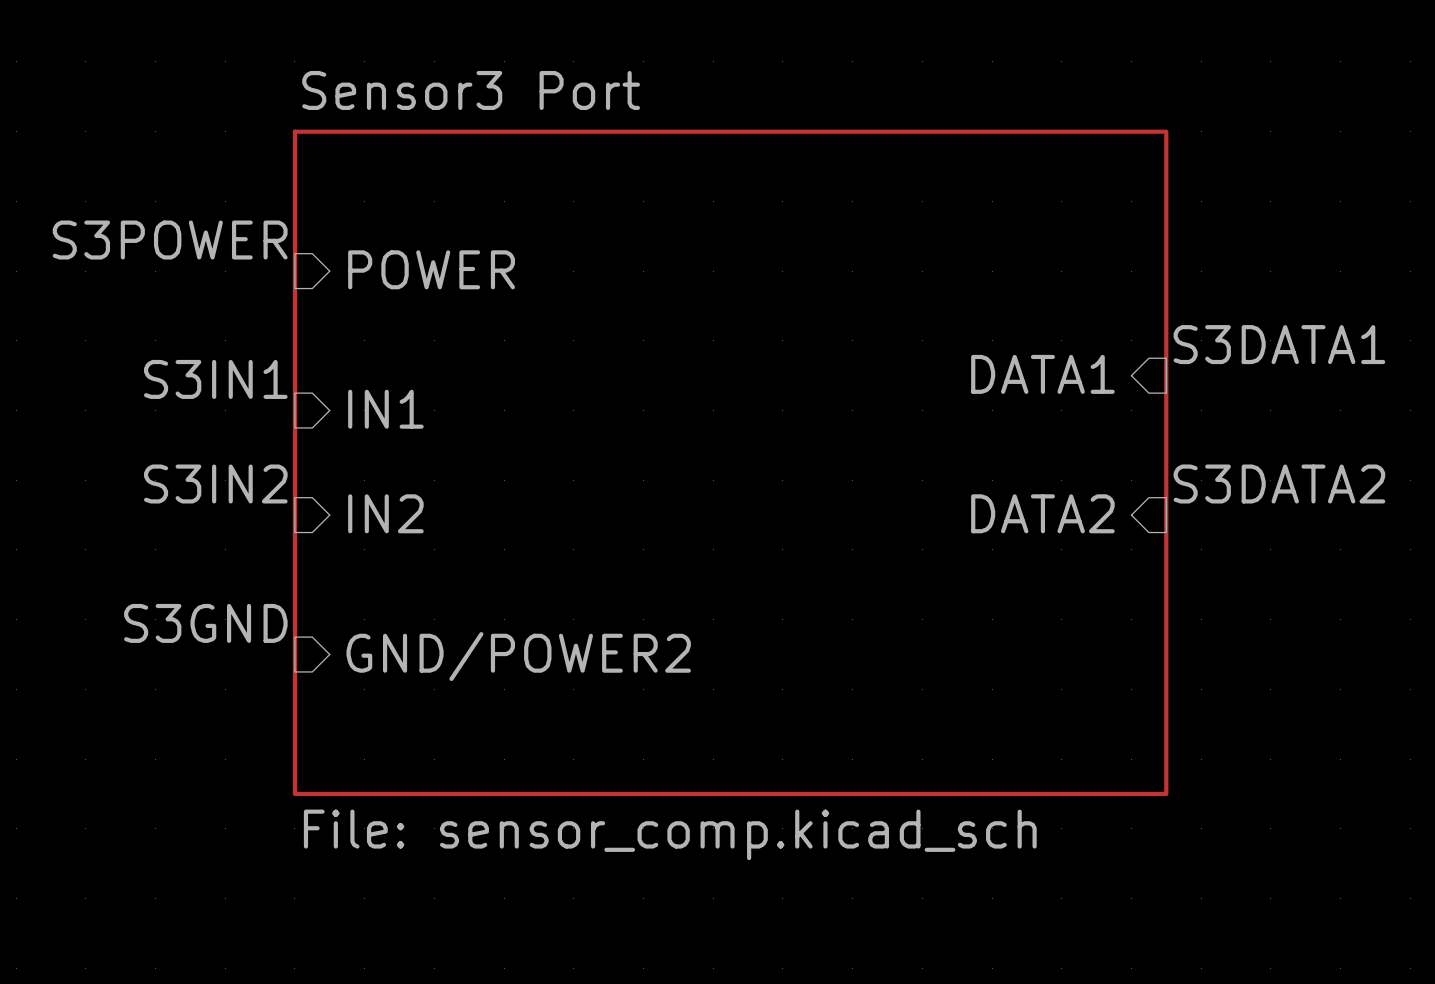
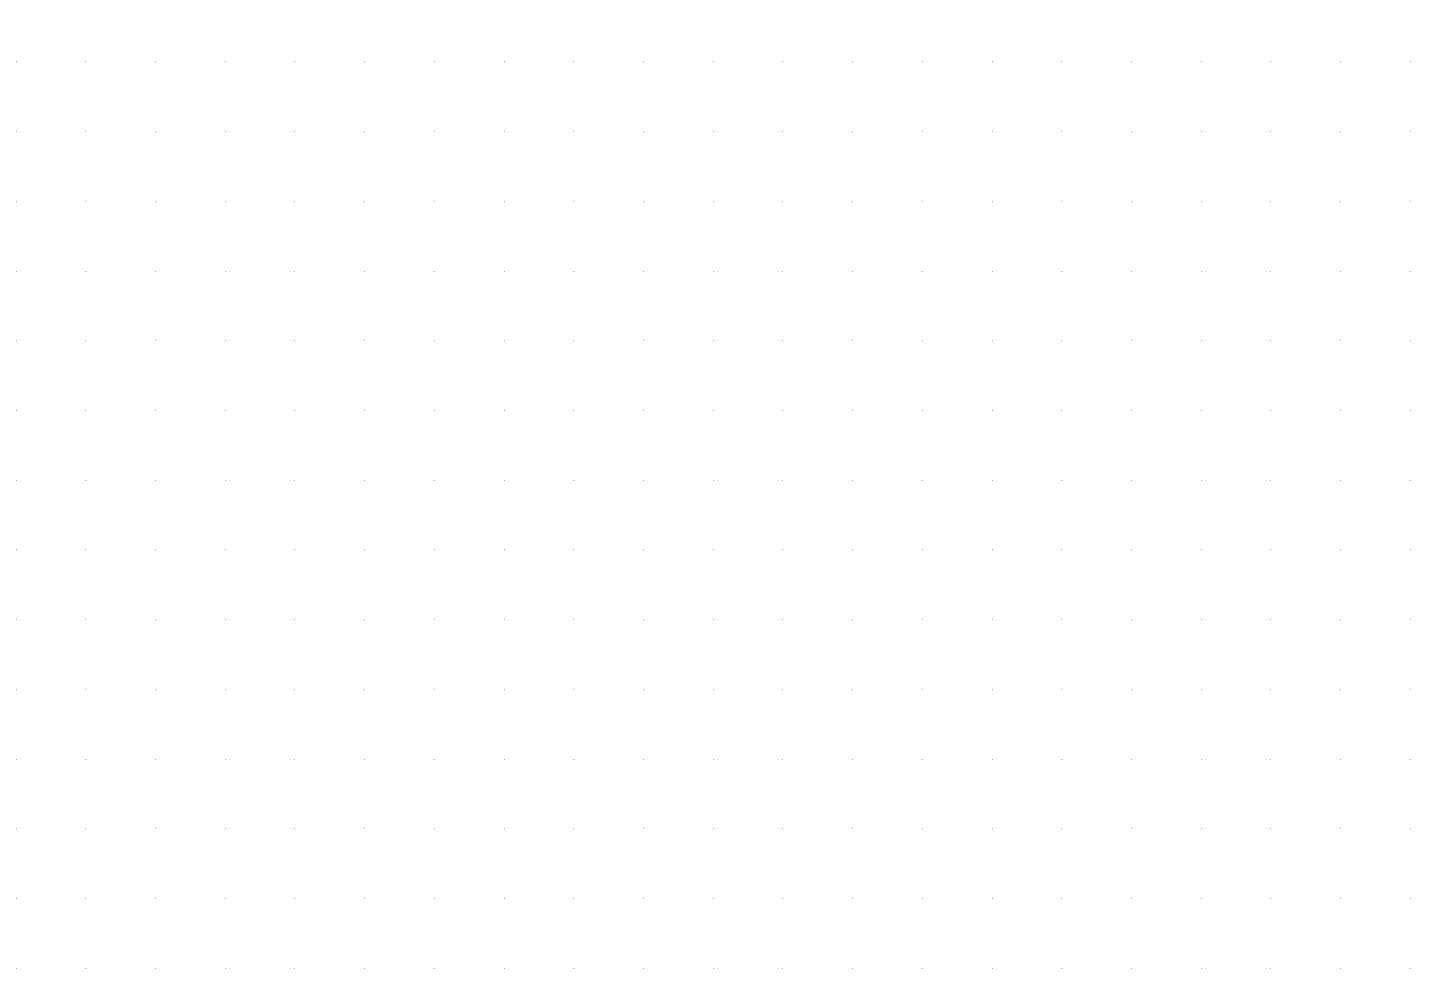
label: S3POWER (170, 240) -> none
sheet pin: POWER (431, 269) -> none
label: S3DATA1 (1279, 344) -> none
sheet pin: DATA1 (1042, 374) -> none
label: S3IN1 (215, 379) -> none
sheet pin: IN1 (385, 409) -> none
sheet Sensor3 Port: File: sensor_comp.kicad_sch (730, 462) -> none
label: S3IN2 (215, 484) -> none
label: S3DATA2 (1279, 484) -> none
sheet pin: IN2 (385, 513) -> none
sheet pin: DATA2 (1042, 513) -> none
label: S3GND (205, 623) -> none
sheet pin: GND/POWER2 (518, 656) -> none

